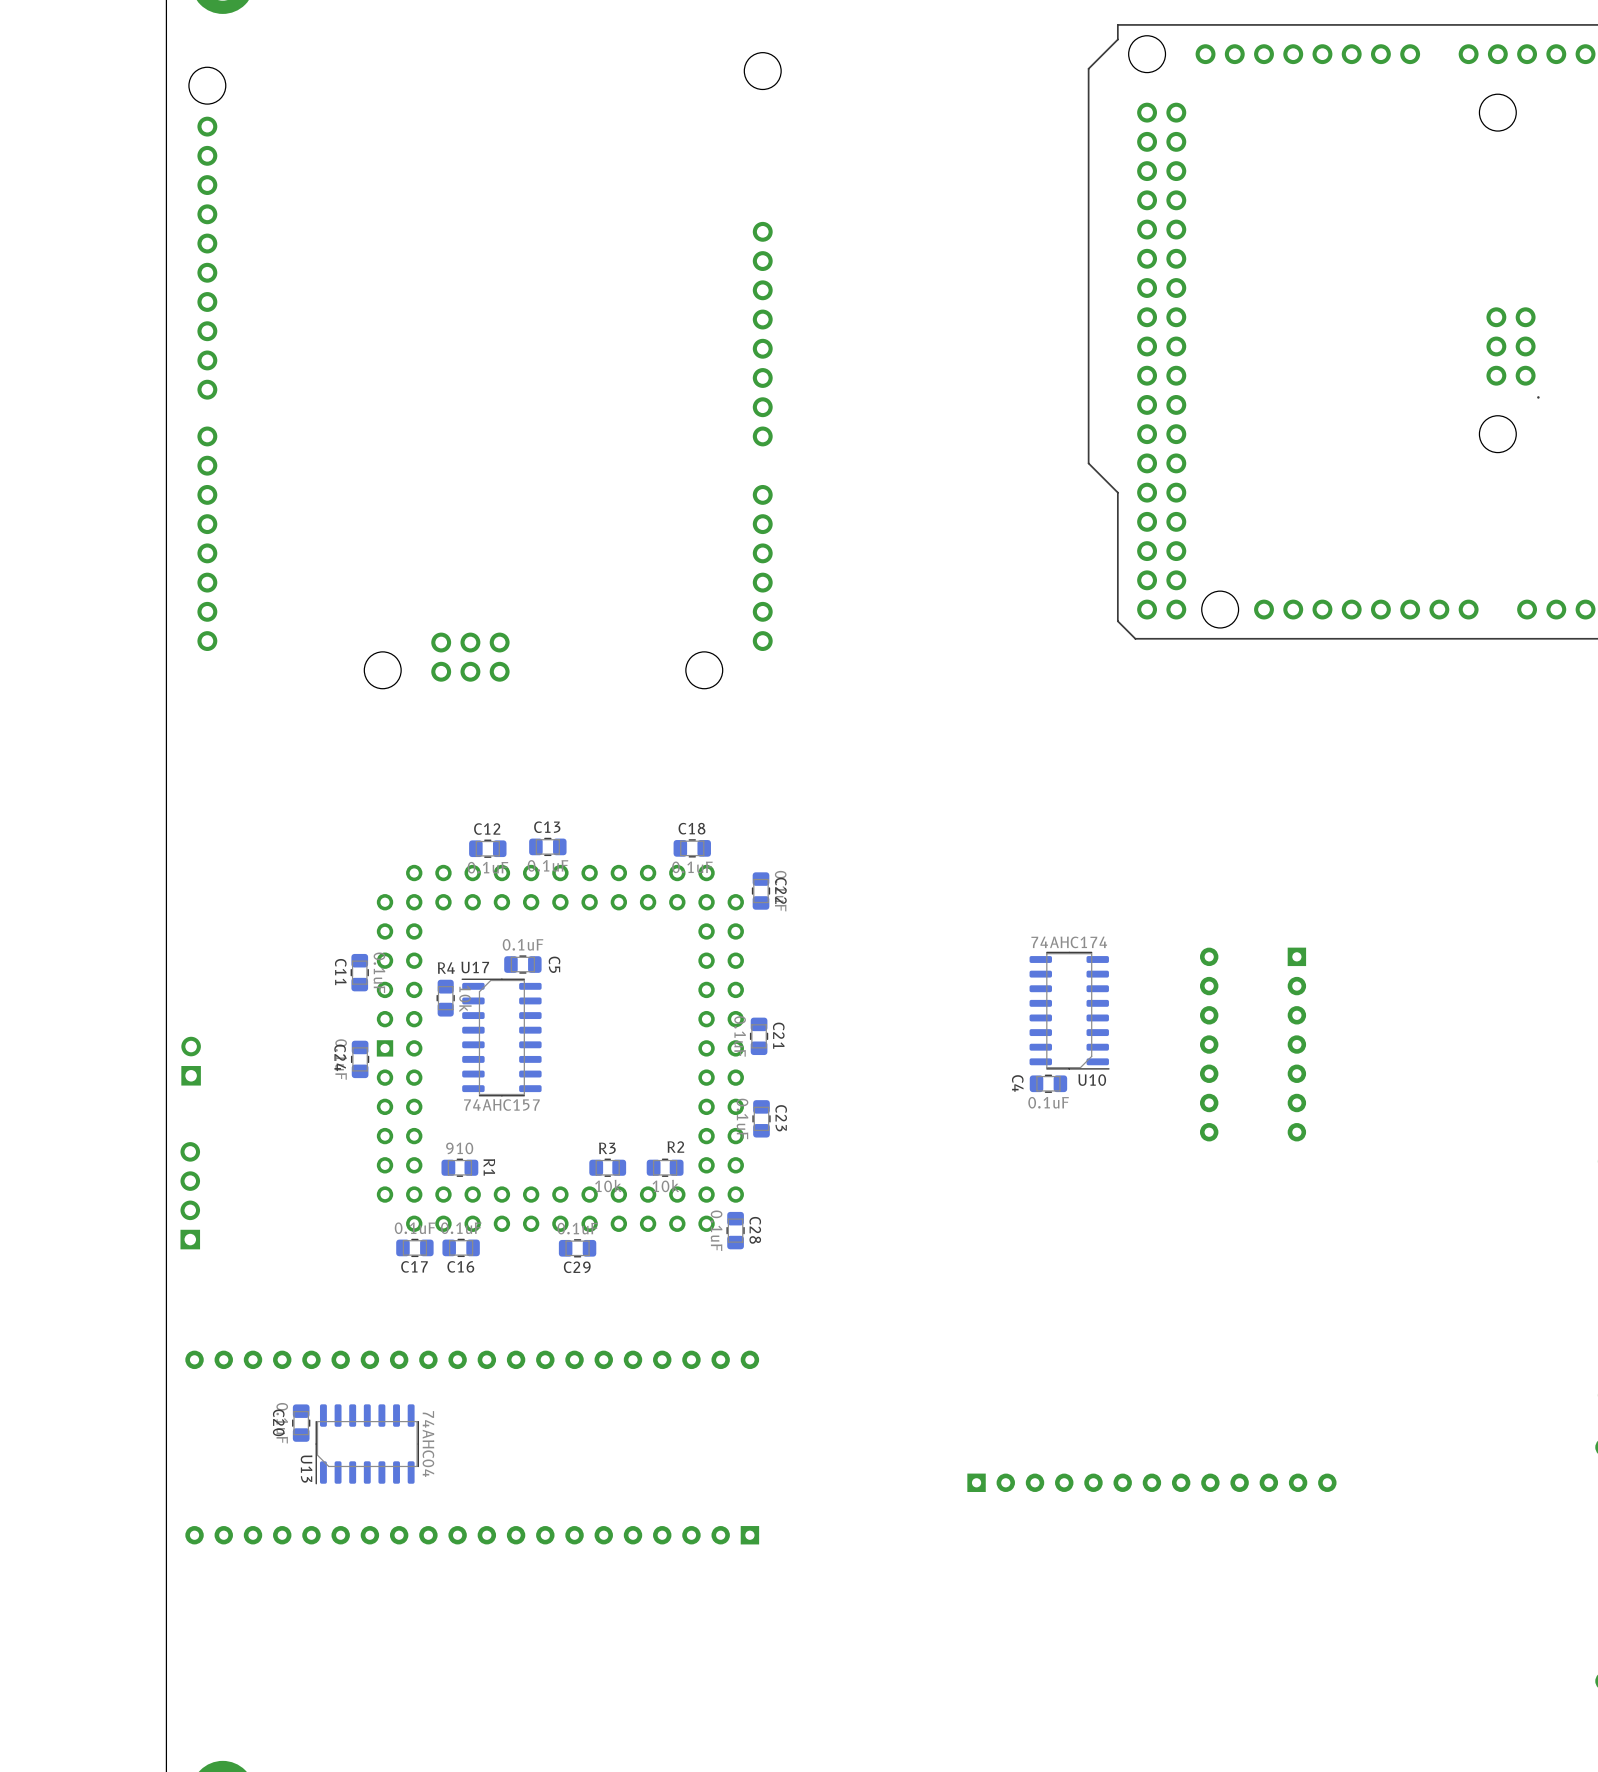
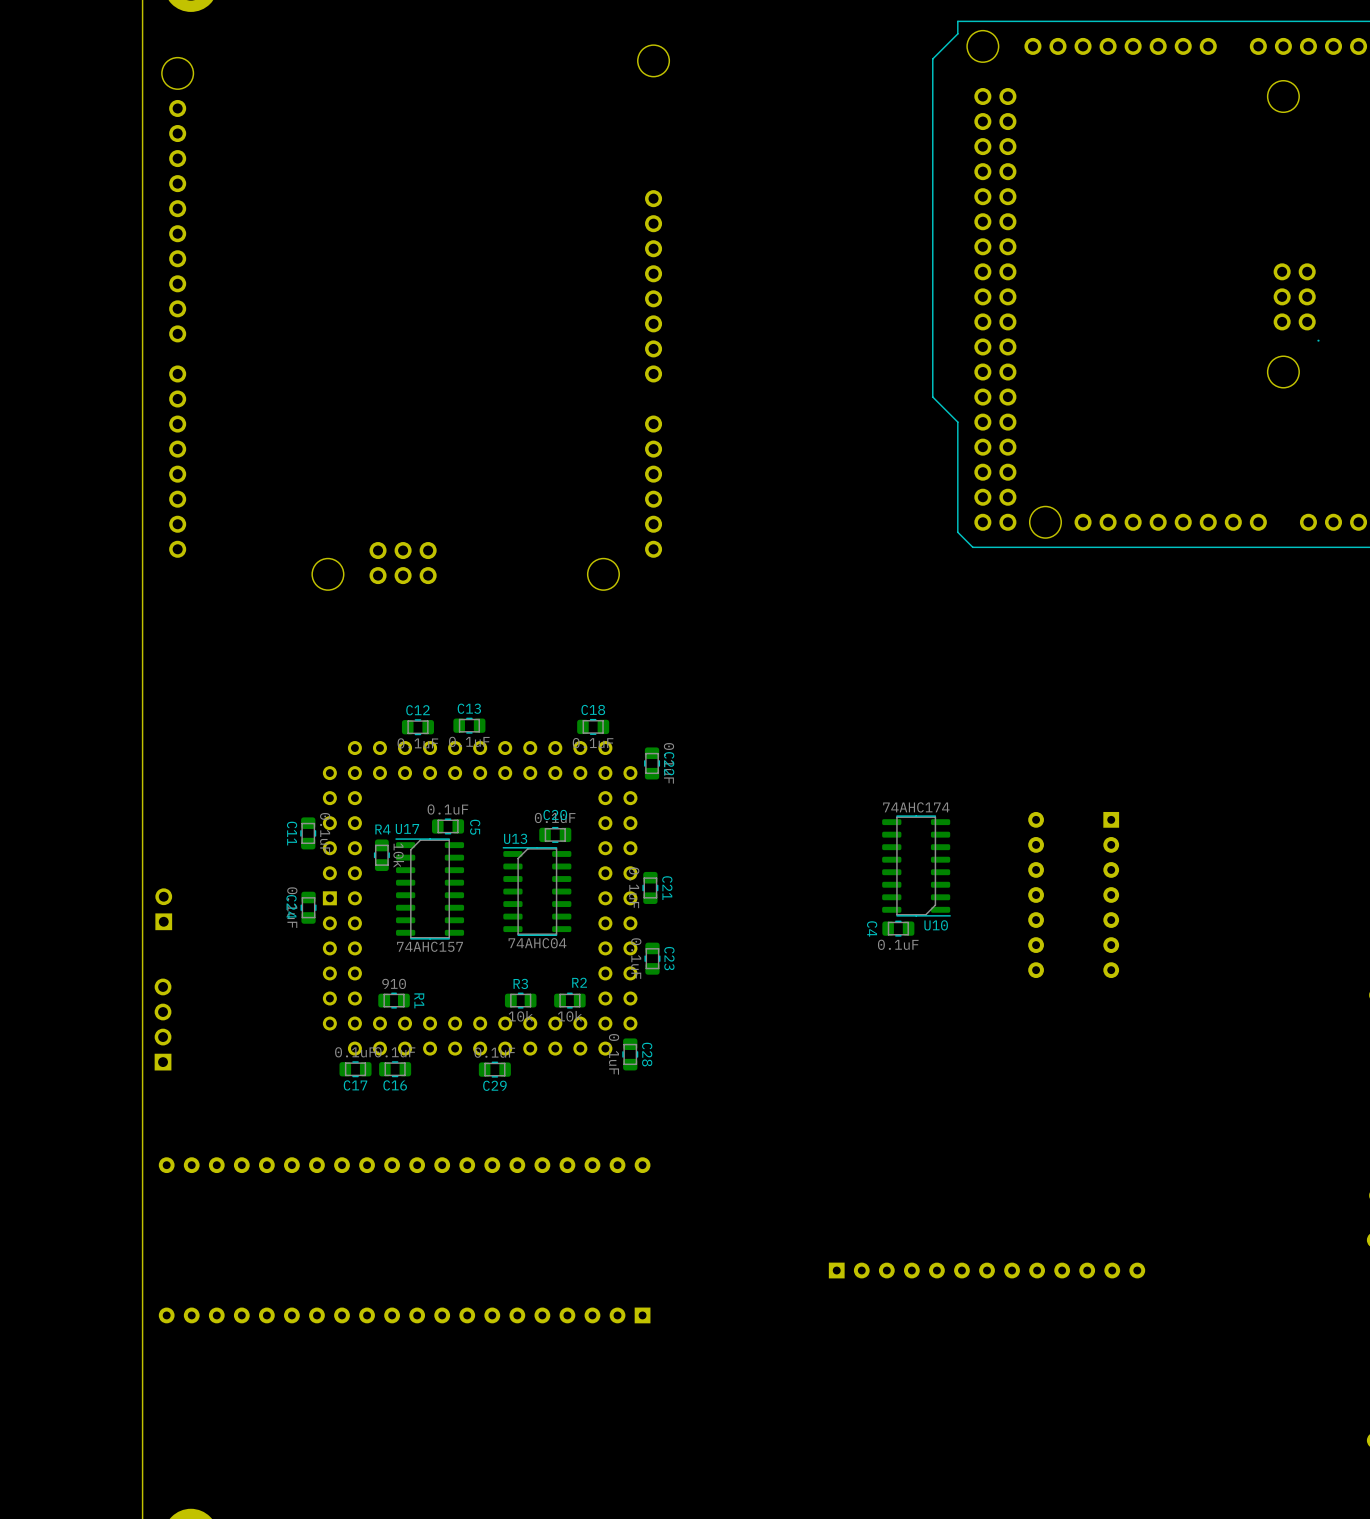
C20 rotation: 0° (301, 1423) -> 90° clockwise (555, 834)
C20 position: (301, 1423) -> (555, 834)
U13 rotation: 0° (367, 1444) -> 90° clockwise (537, 891)
U13 position: (367, 1444) -> (537, 891)

